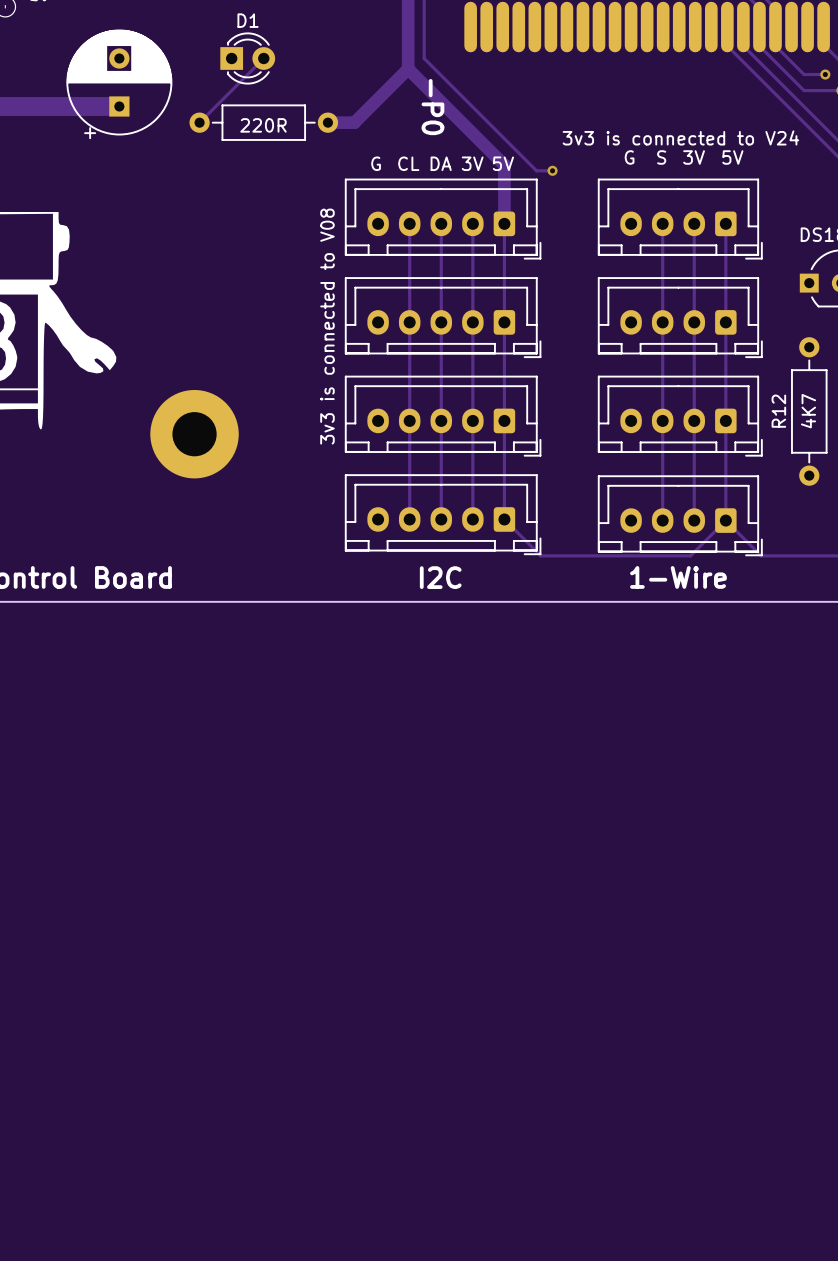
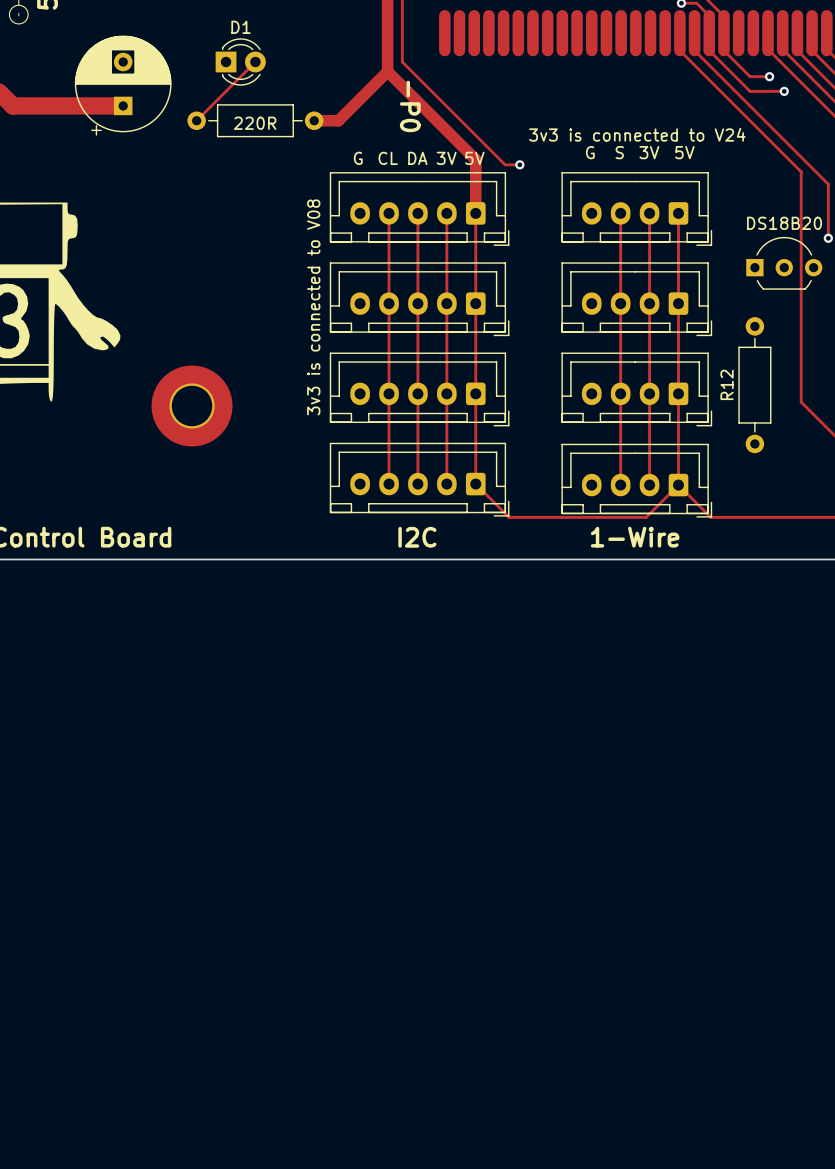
R12 value: 4K7 (808, 411) -> none

